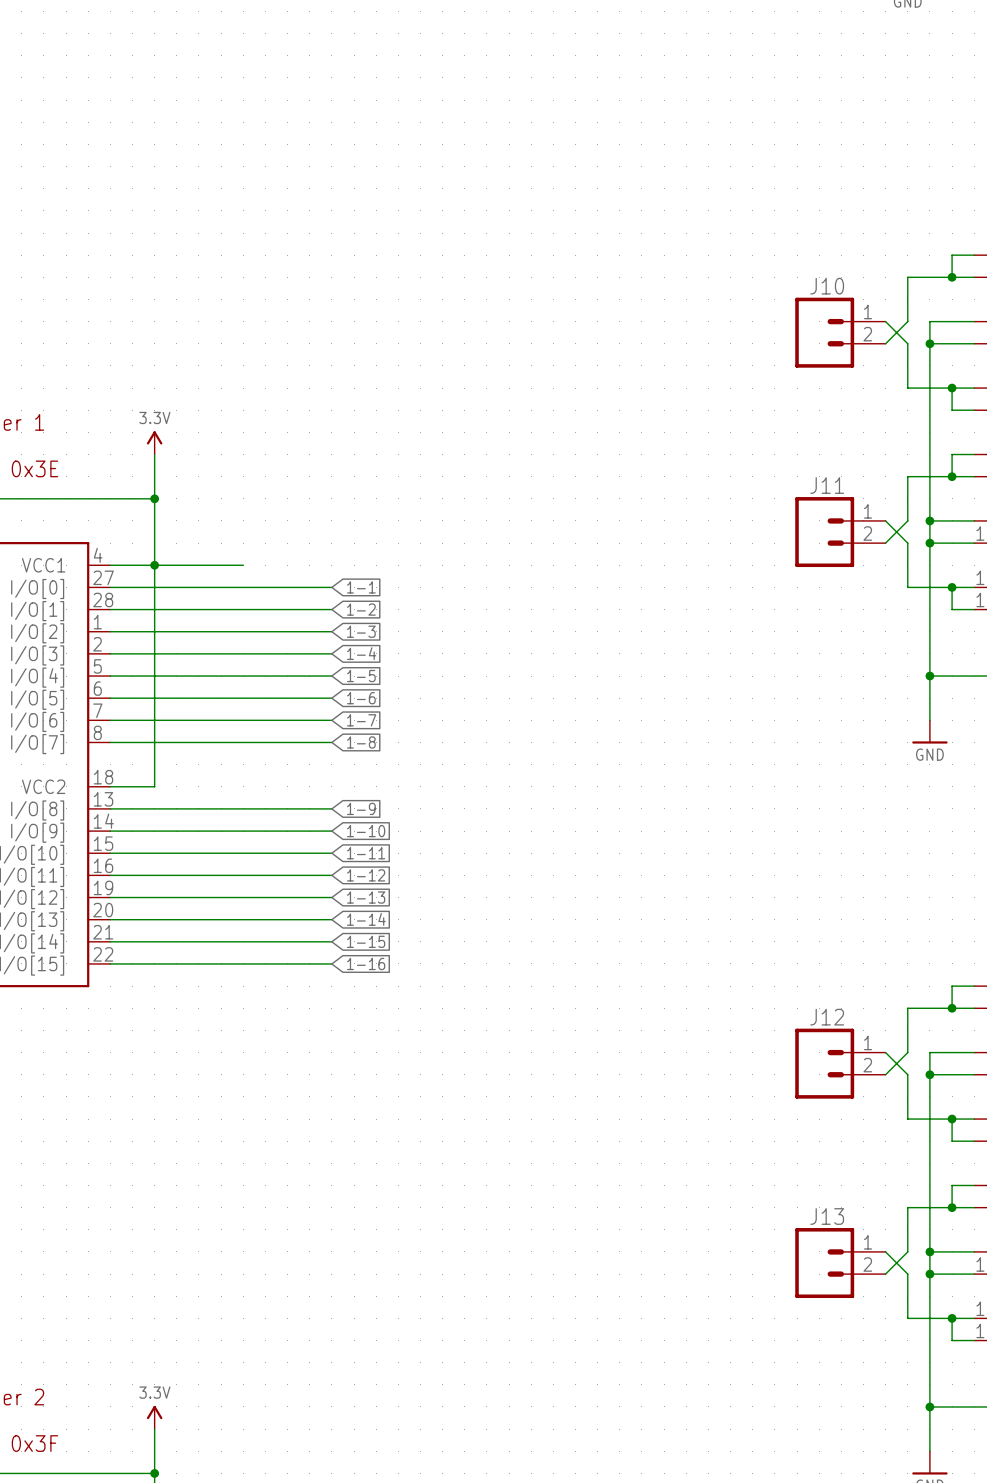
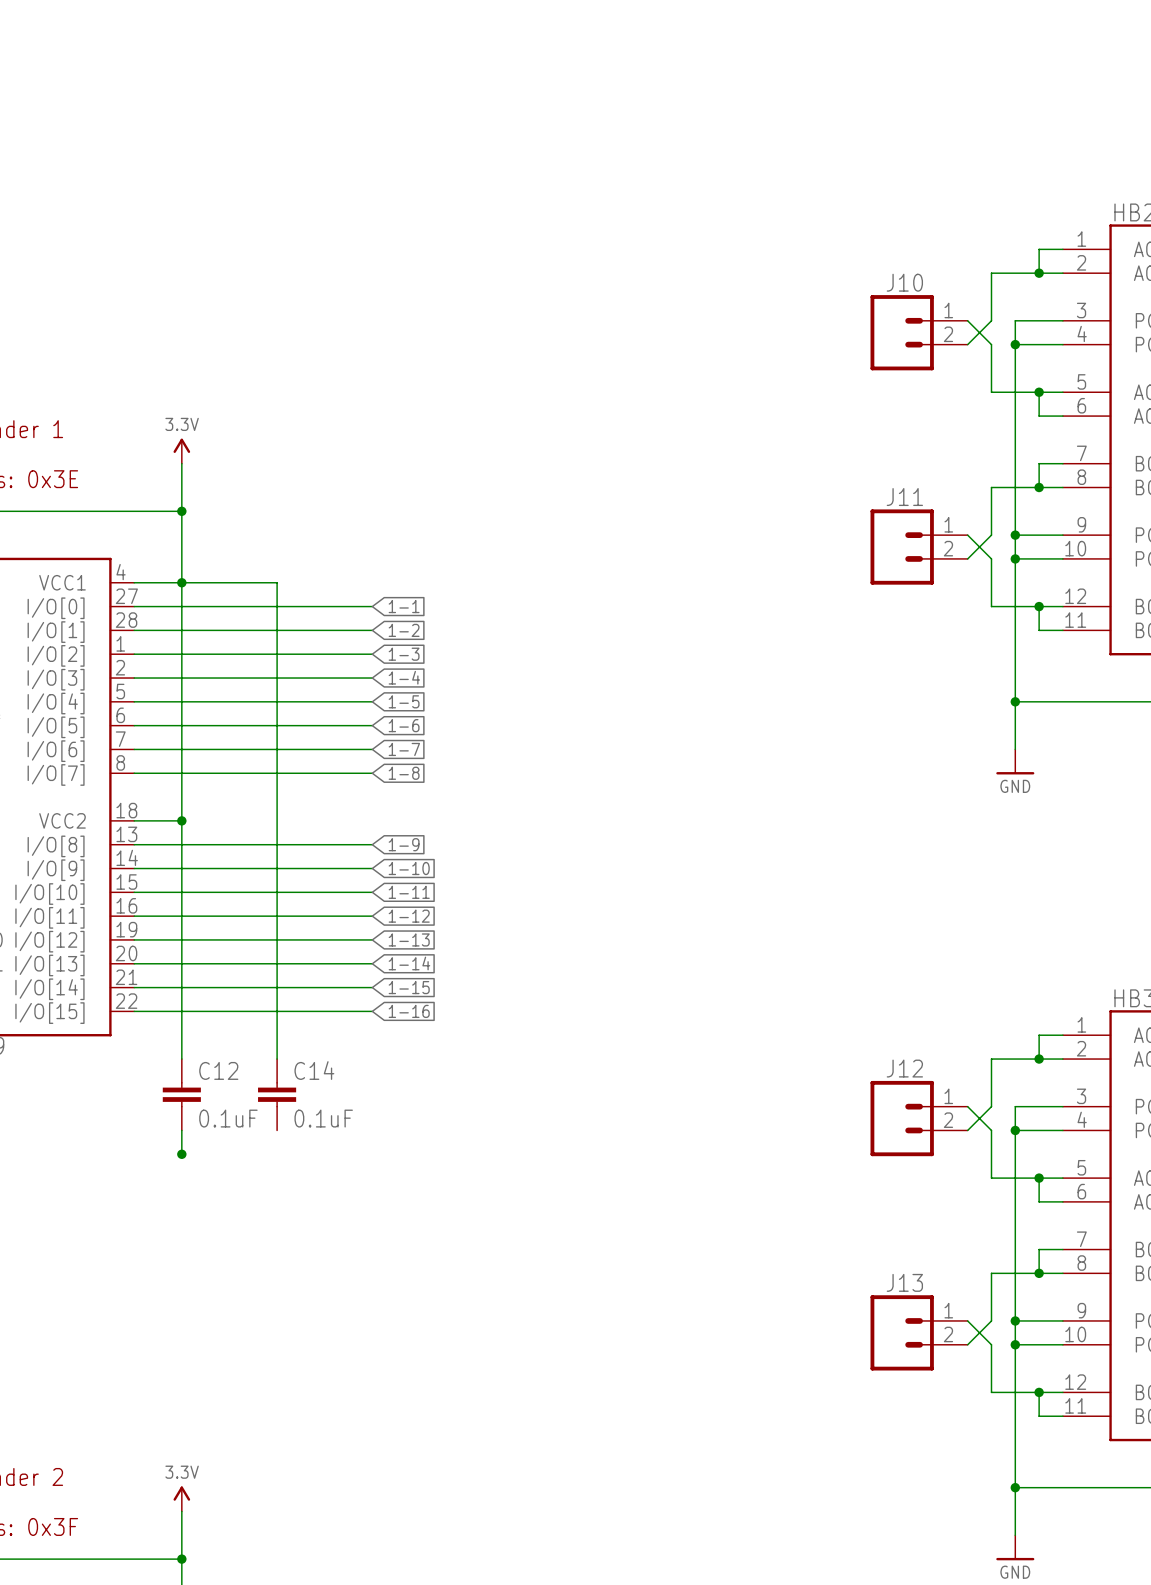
wire: none -> (277, 582) (277, 1059)
wire: none -> (181, 820) (181, 1059)
junction: none -> (181, 820)
C12: none -> 0.1uF (181, 1094)
C14: none -> 0.1uF (277, 1094)
wire: none -> (181, 1130) (181, 1154)
junction: none -> (181, 1154)

